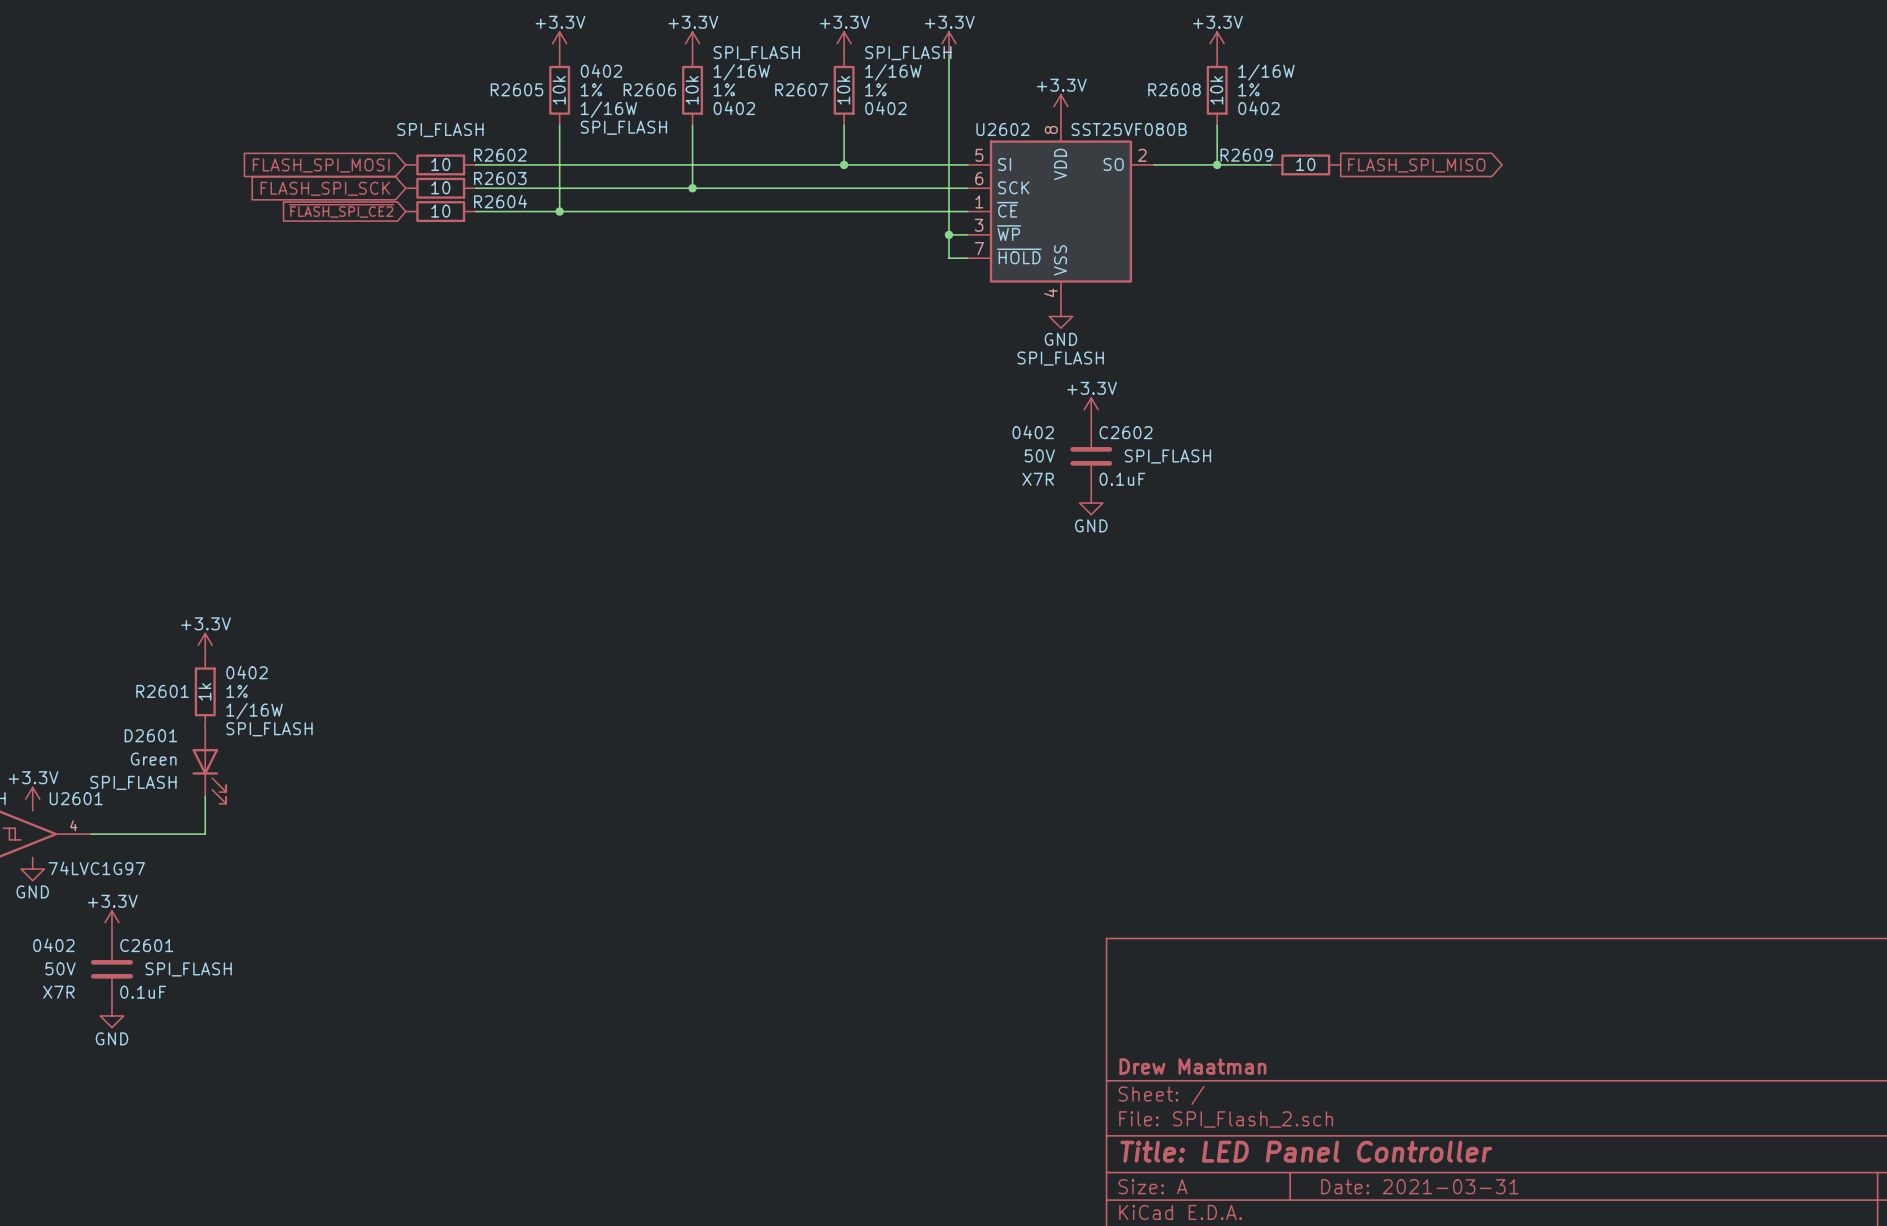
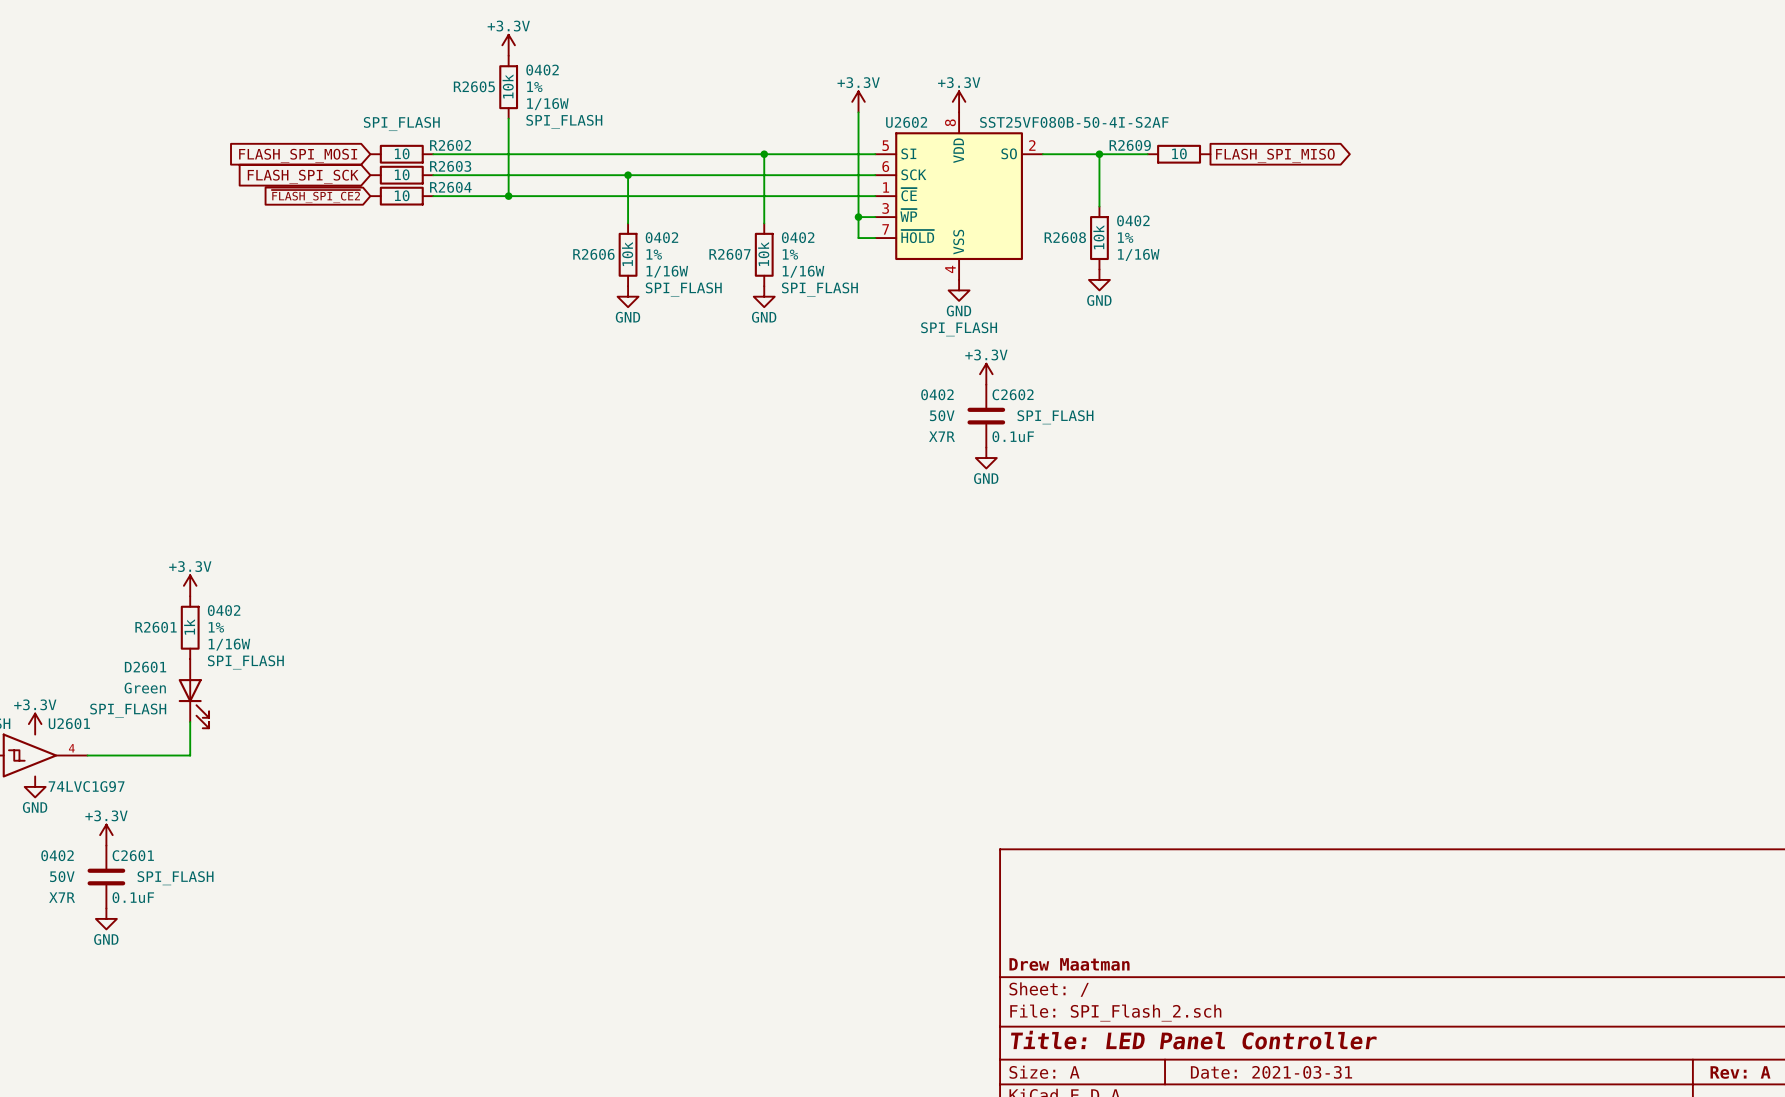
power symbol: +3.3V (692, 43) -> none
power symbol: +3.3V (844, 43) -> none
power symbol: +3.3V (949, 43) -> none
power symbol: +3.3V (1217, 43) -> none
R2606 text position: SPI_FLASH (756, 53) -> SPI_FLASH (683, 289)
R2607 text position: SPI_FLASH (908, 53) -> SPI_FLASH (819, 289)
wire: (949, 55) (949, 118) -> none
R2606 text position: 1/16W (741, 72) -> 1/16W (667, 271)
R2607 text position: 1/16W (893, 72) -> 1/16W (803, 271)
R2608 text position: 1/16W (1266, 72) -> 1/16W (1138, 254)
R2606 position: (692, 90) -> (628, 254)
R2607 position: (844, 90) -> (764, 254)
R2608 position: (1217, 90) -> (1099, 238)
power symbol: none -> +3.3V (858, 101)
R2606 text position: 0402 (734, 108) -> 0402 (661, 237)
R2607 text position: 0402 (885, 108) -> 0402 (798, 237)
R2608 text position: 0402 (1258, 108) -> 0402 (1133, 220)
wire: (692, 125) (692, 188) -> (628, 223) (628, 175)
wire: (844, 125) (844, 164) -> (764, 223) (764, 154)
wire: (1217, 125) (1217, 164) -> (1099, 206) (1099, 154)
U2602 value: SST25VF080B (1129, 129) -> SST25VF080B-50-4I-S2AF (1074, 122)
power symbol: none -> GND (1099, 279)
power symbol: none -> GND (628, 296)
power symbol: none -> GND (764, 296)

